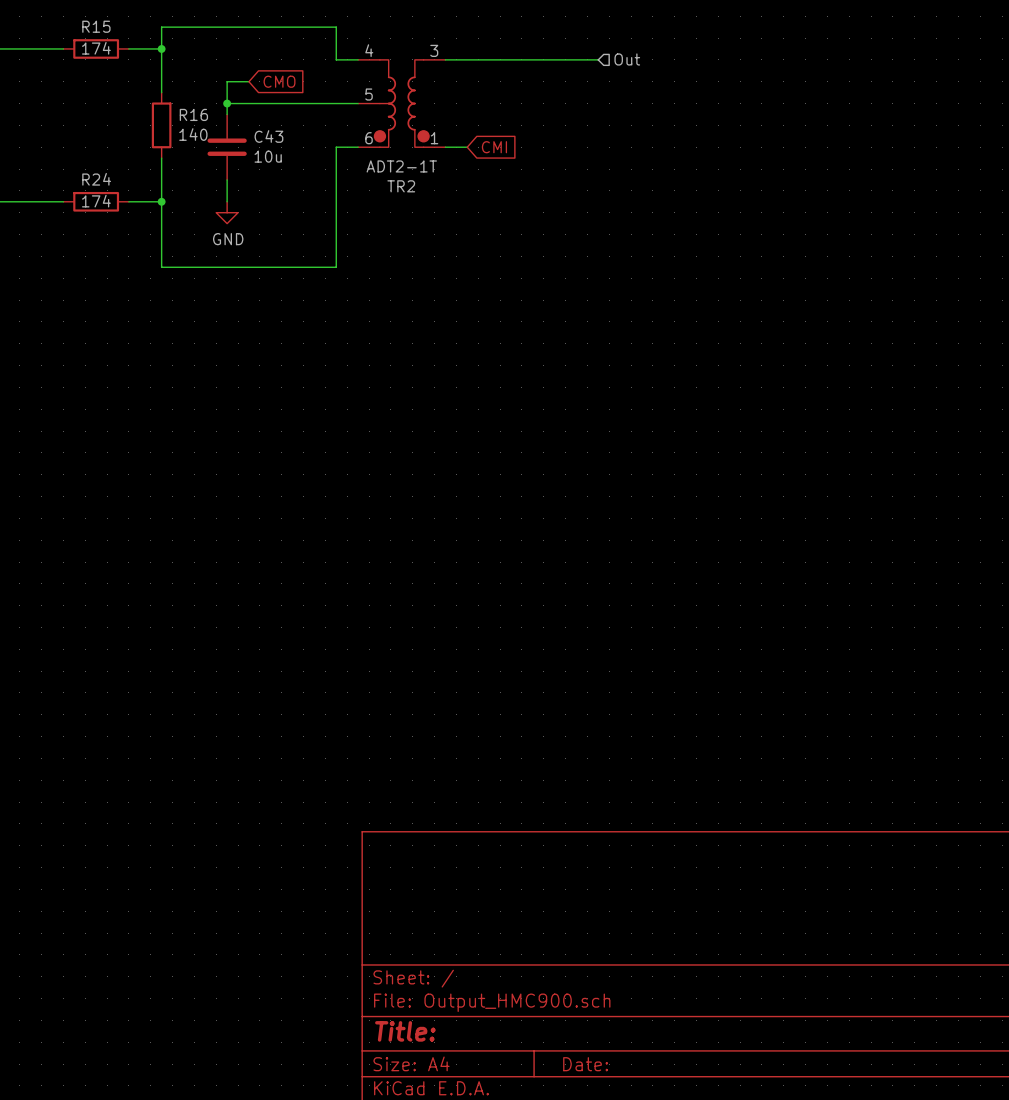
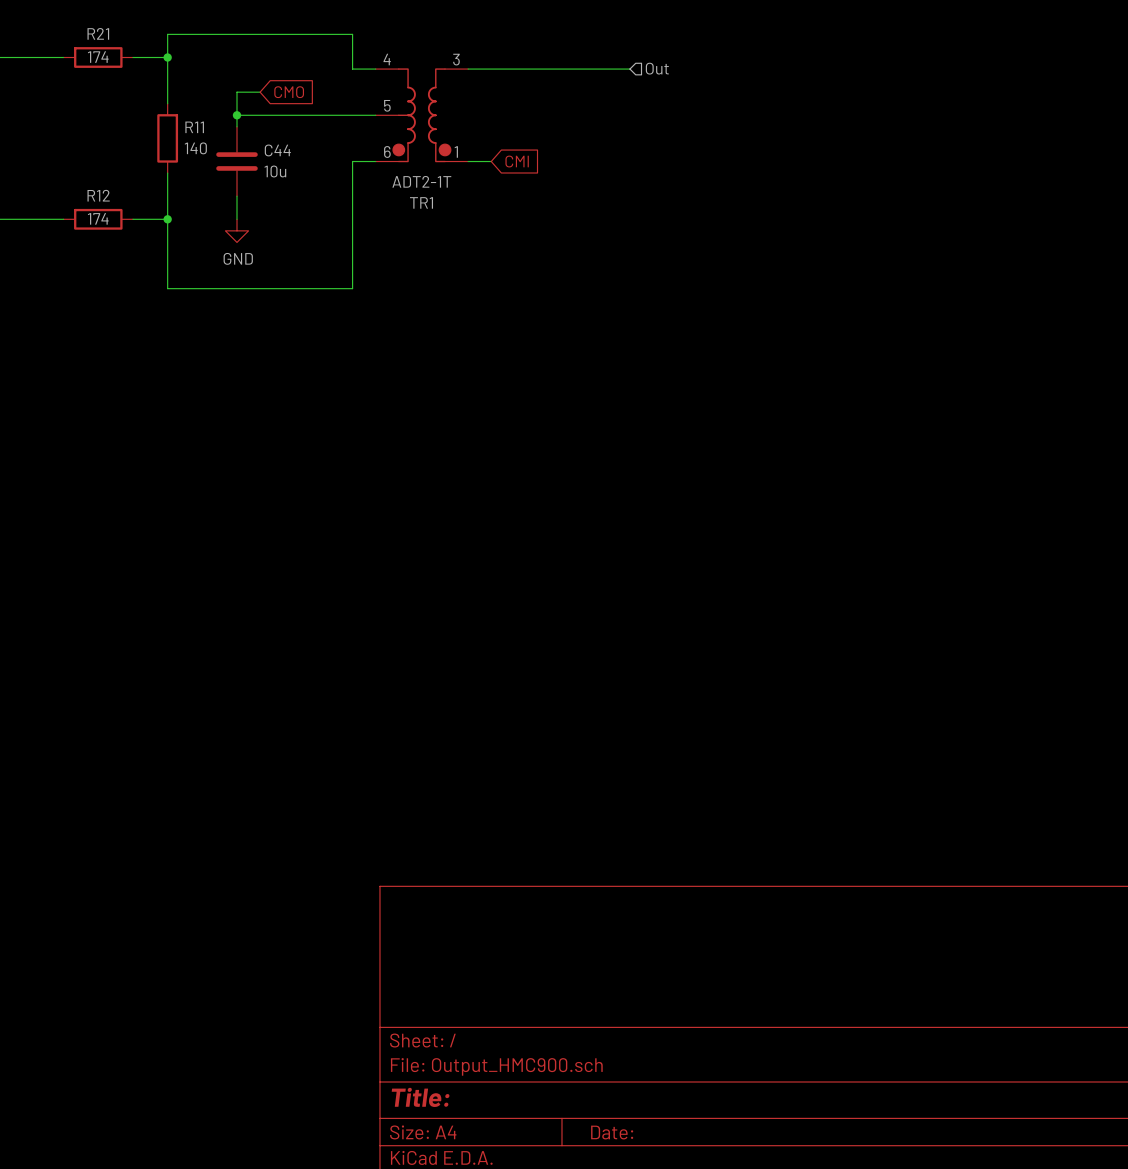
R15 name: R15 (96, 26) -> R21 (98, 33)
R16 name: R16 (193, 114) -> R11 (194, 127)
C43 name: C43 (268, 136) -> C44 (277, 150)
R24 name: R24 (96, 179) -> R12 (98, 195)
TR2 name: TR2 (401, 186) -> TR1 (421, 202)

